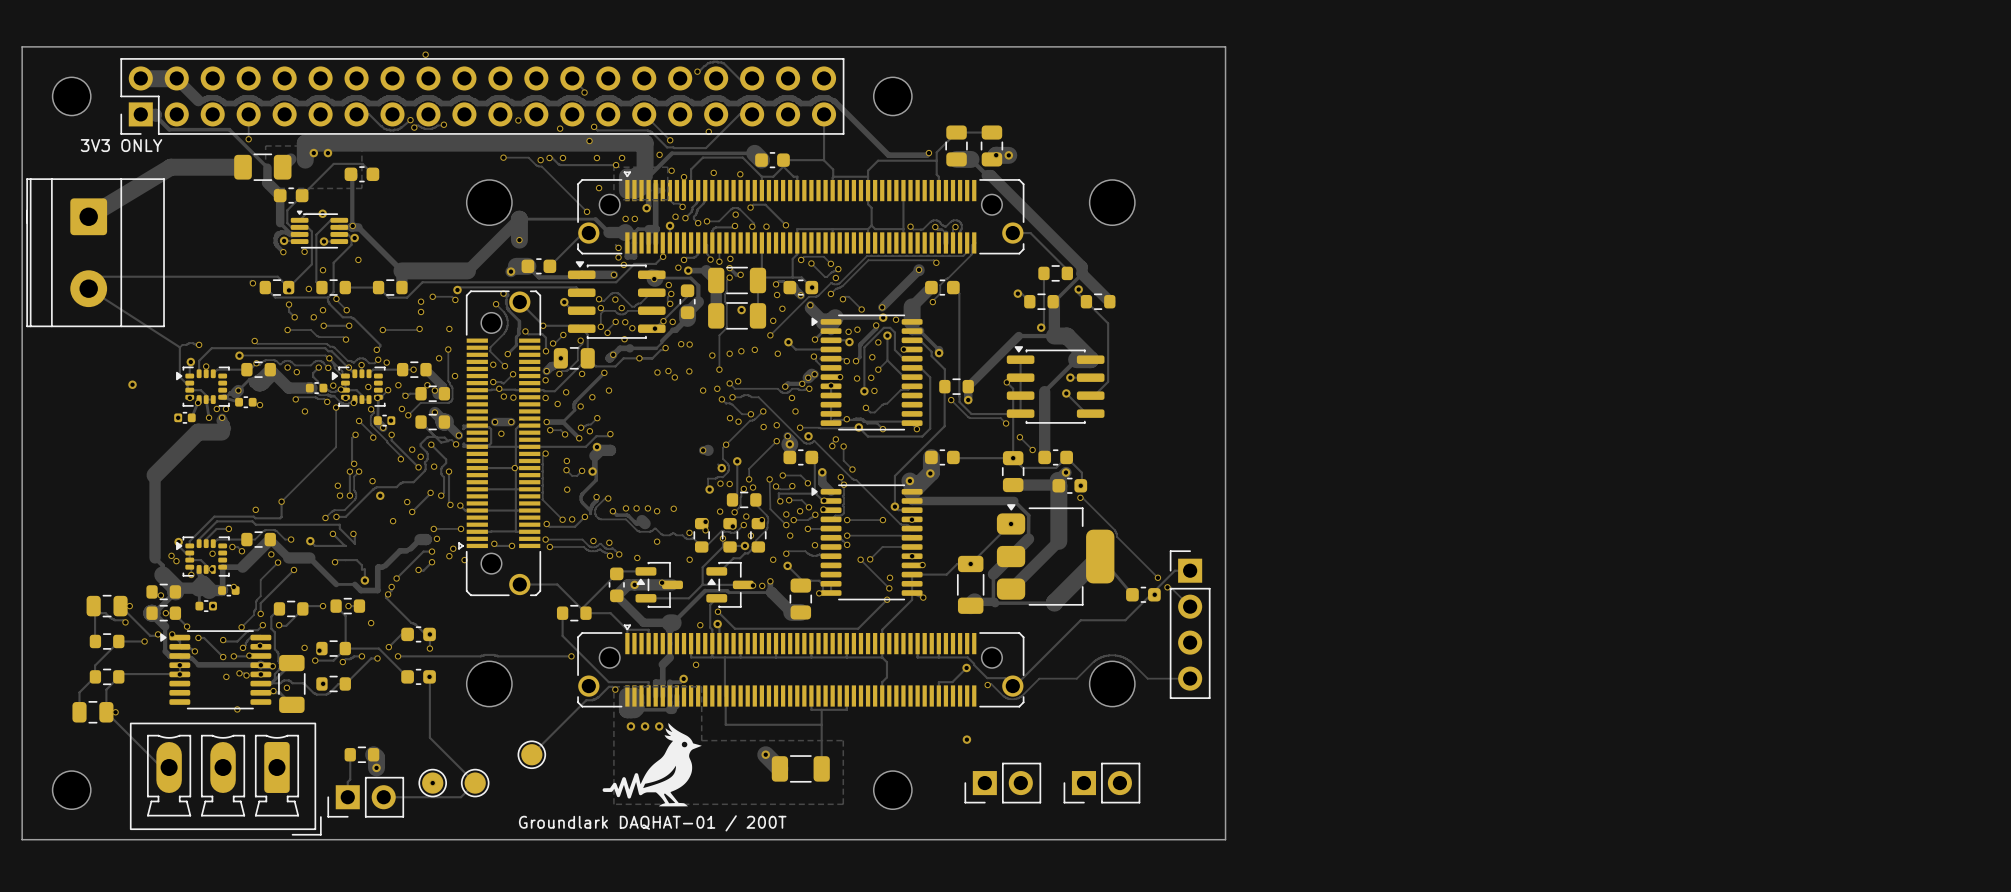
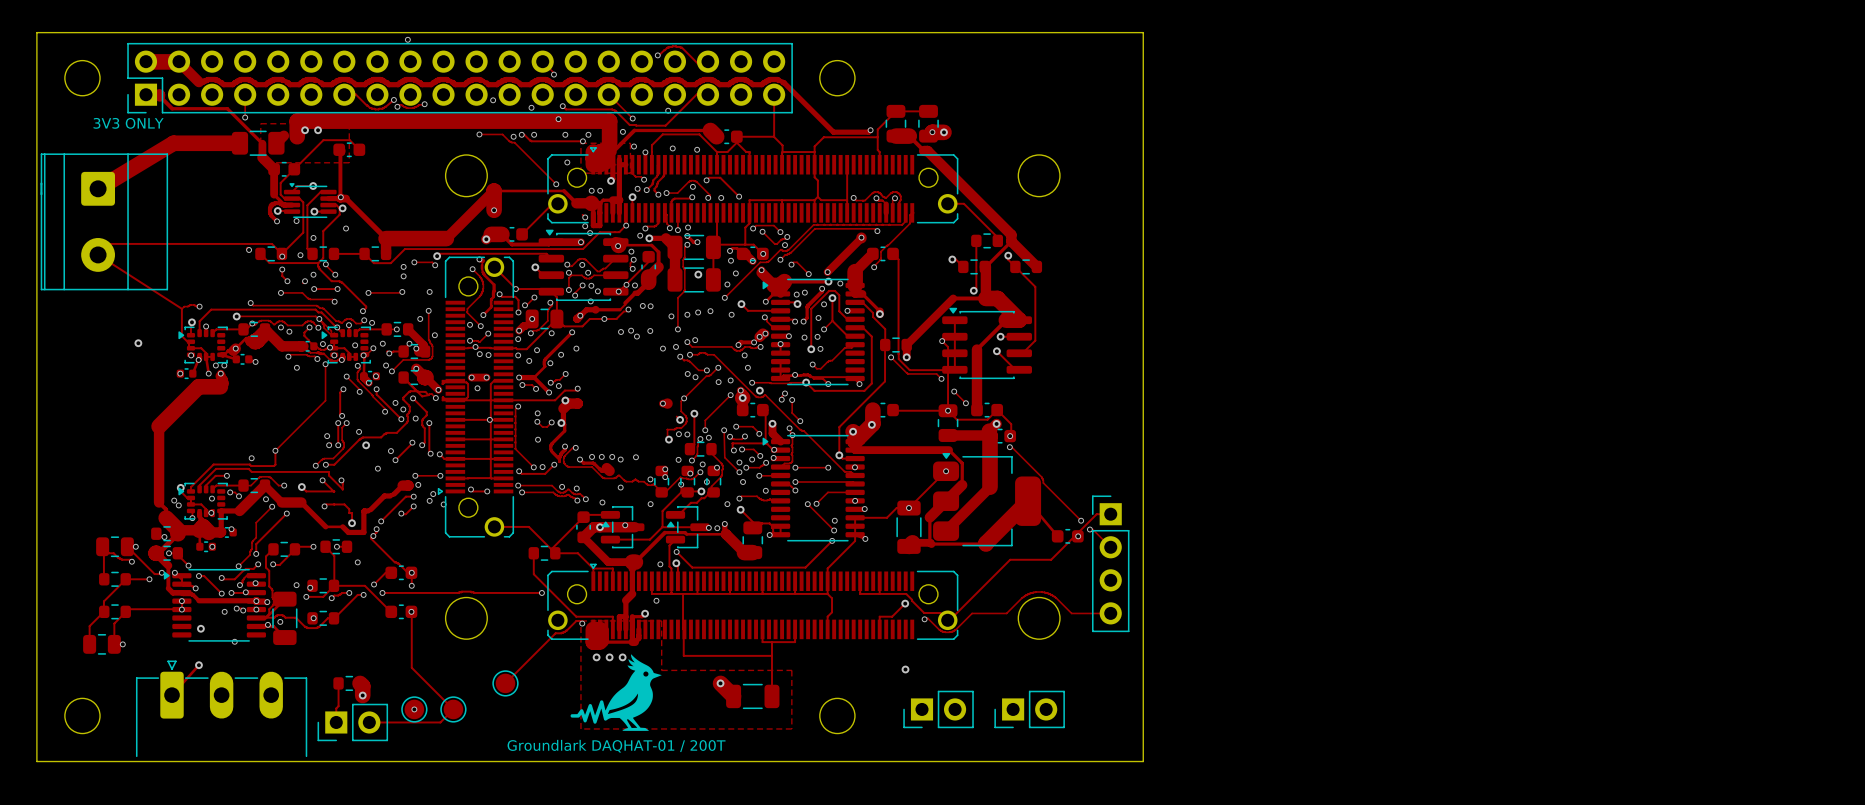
via: none -> (200, 628)
track: (106, 712) (161, 767) (169, 767) -> (198, 665) (172, 695)
part footprint: [129, 722, 322, 836] -> [135, 660, 308, 758]
via: none -> (198, 665)

